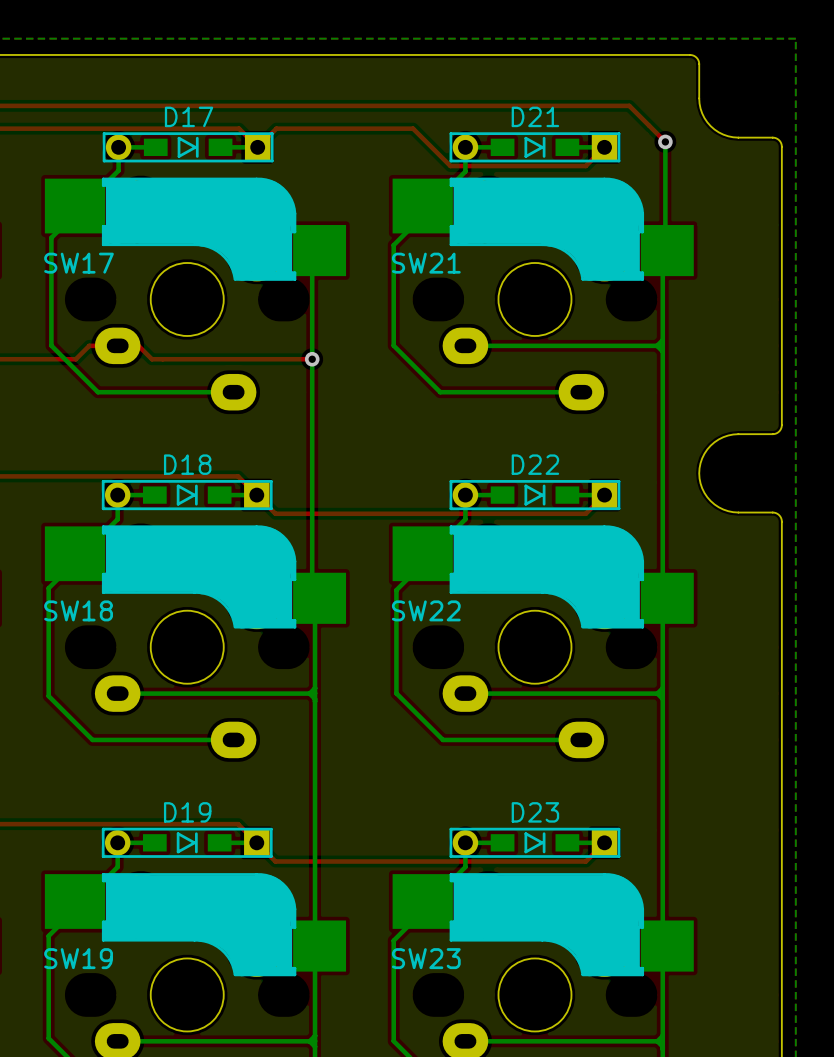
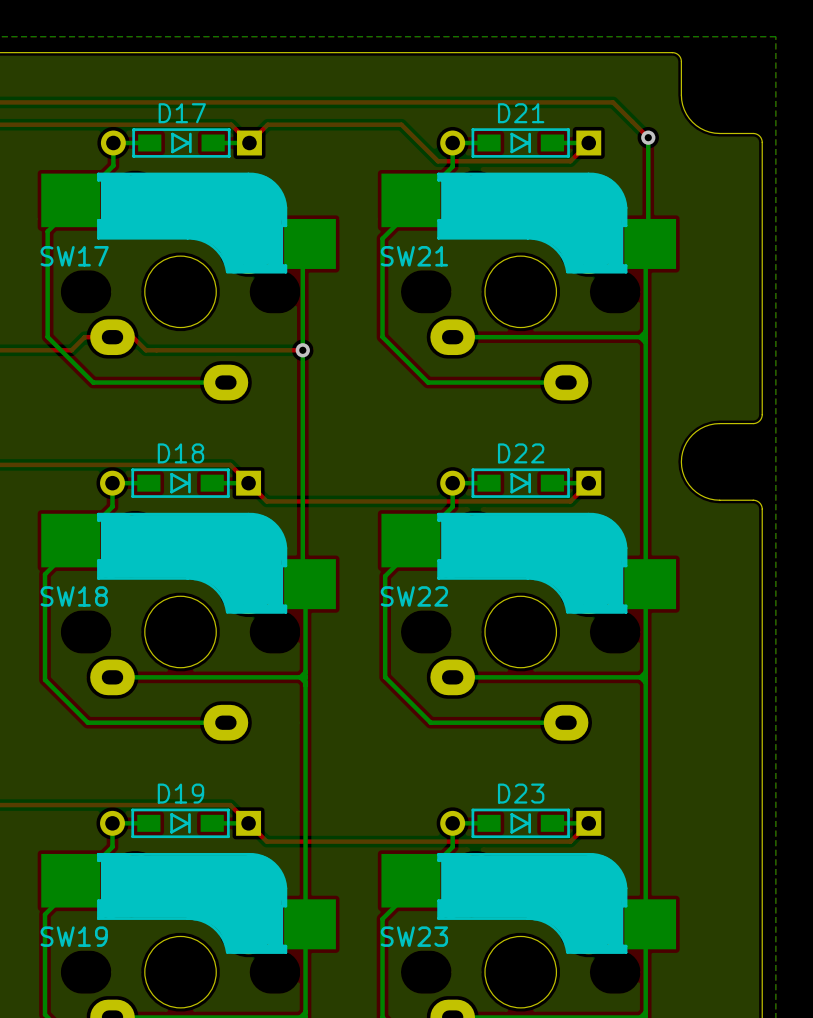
D17 footprint: [102, 132, 274, 163] -> [100, 128, 262, 158]
D21 footprint: [449, 132, 621, 163] -> [440, 128, 602, 158]
D18 footprint: [101, 480, 273, 511] -> [100, 468, 262, 498]
D22 footprint: [449, 480, 621, 511] -> [440, 468, 602, 498]
D19 footprint: [101, 827, 273, 858] -> [100, 808, 262, 839]
D23 footprint: [449, 827, 621, 858] -> [440, 808, 602, 839]

